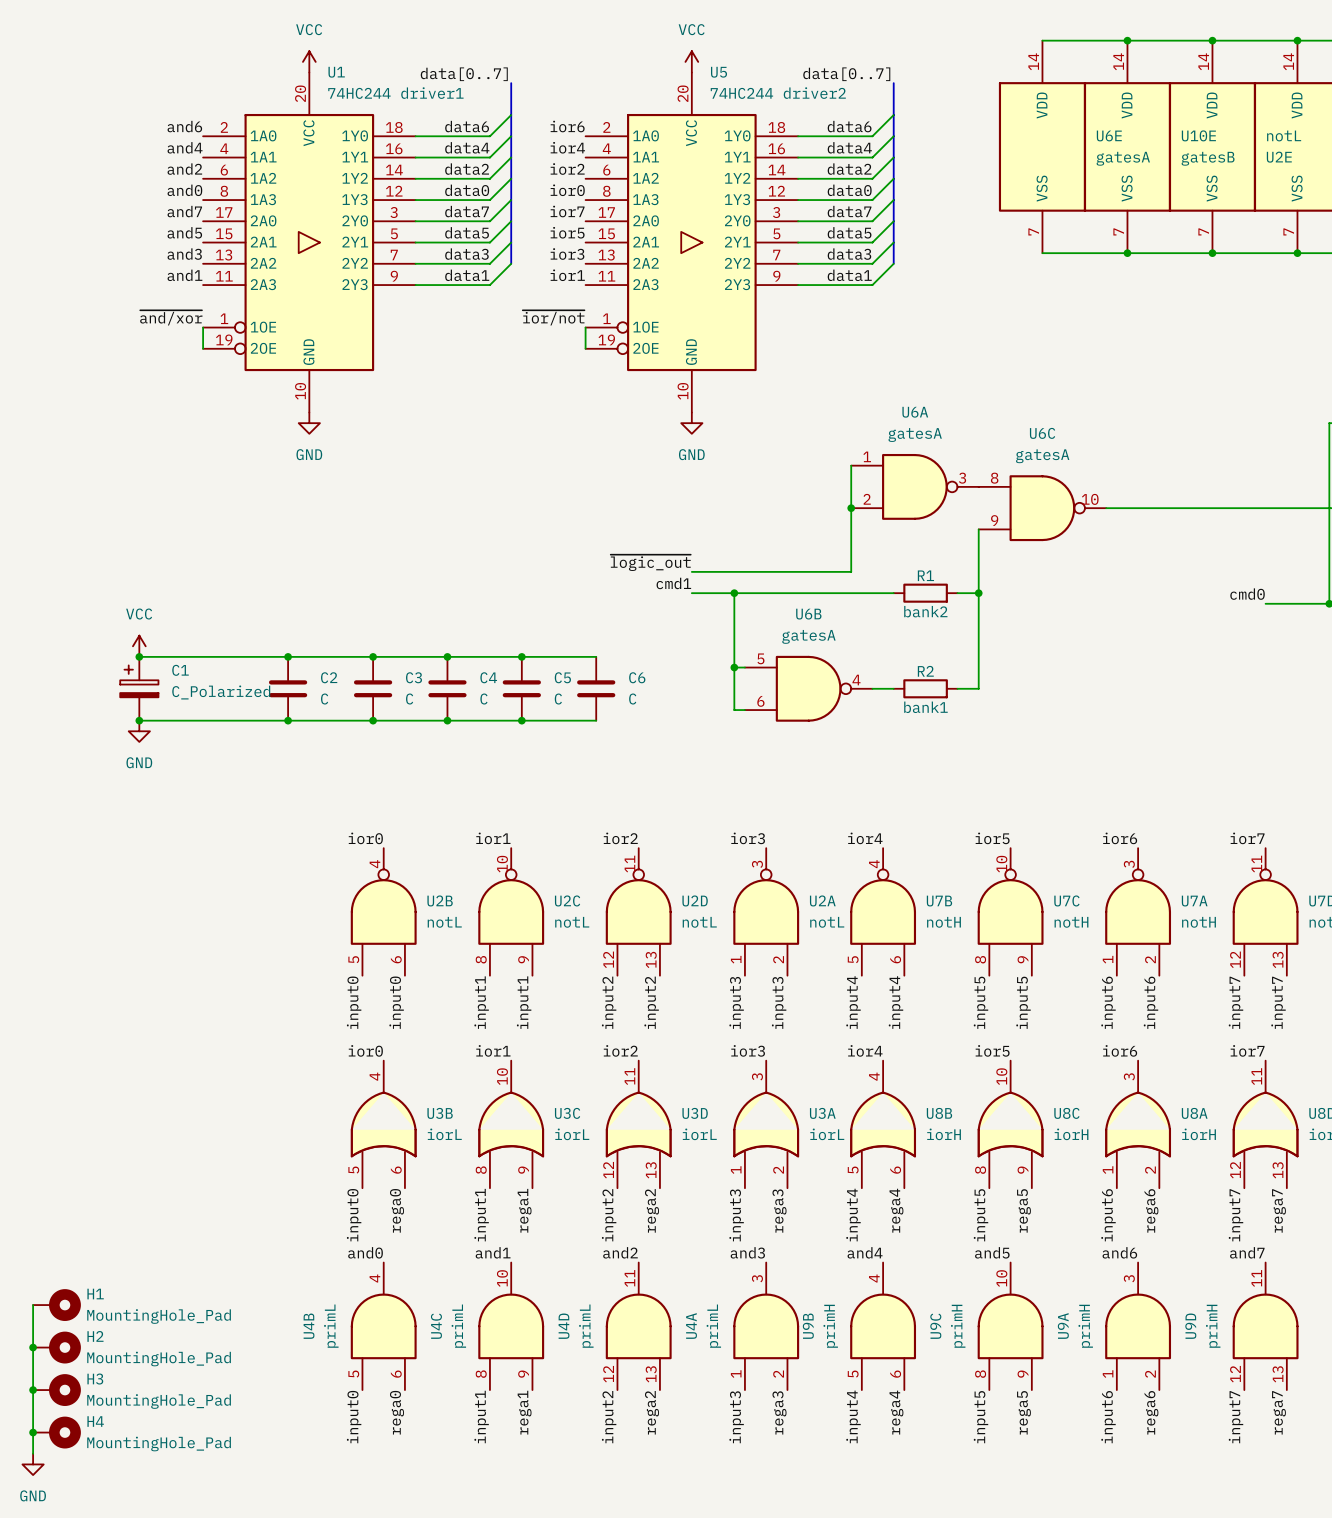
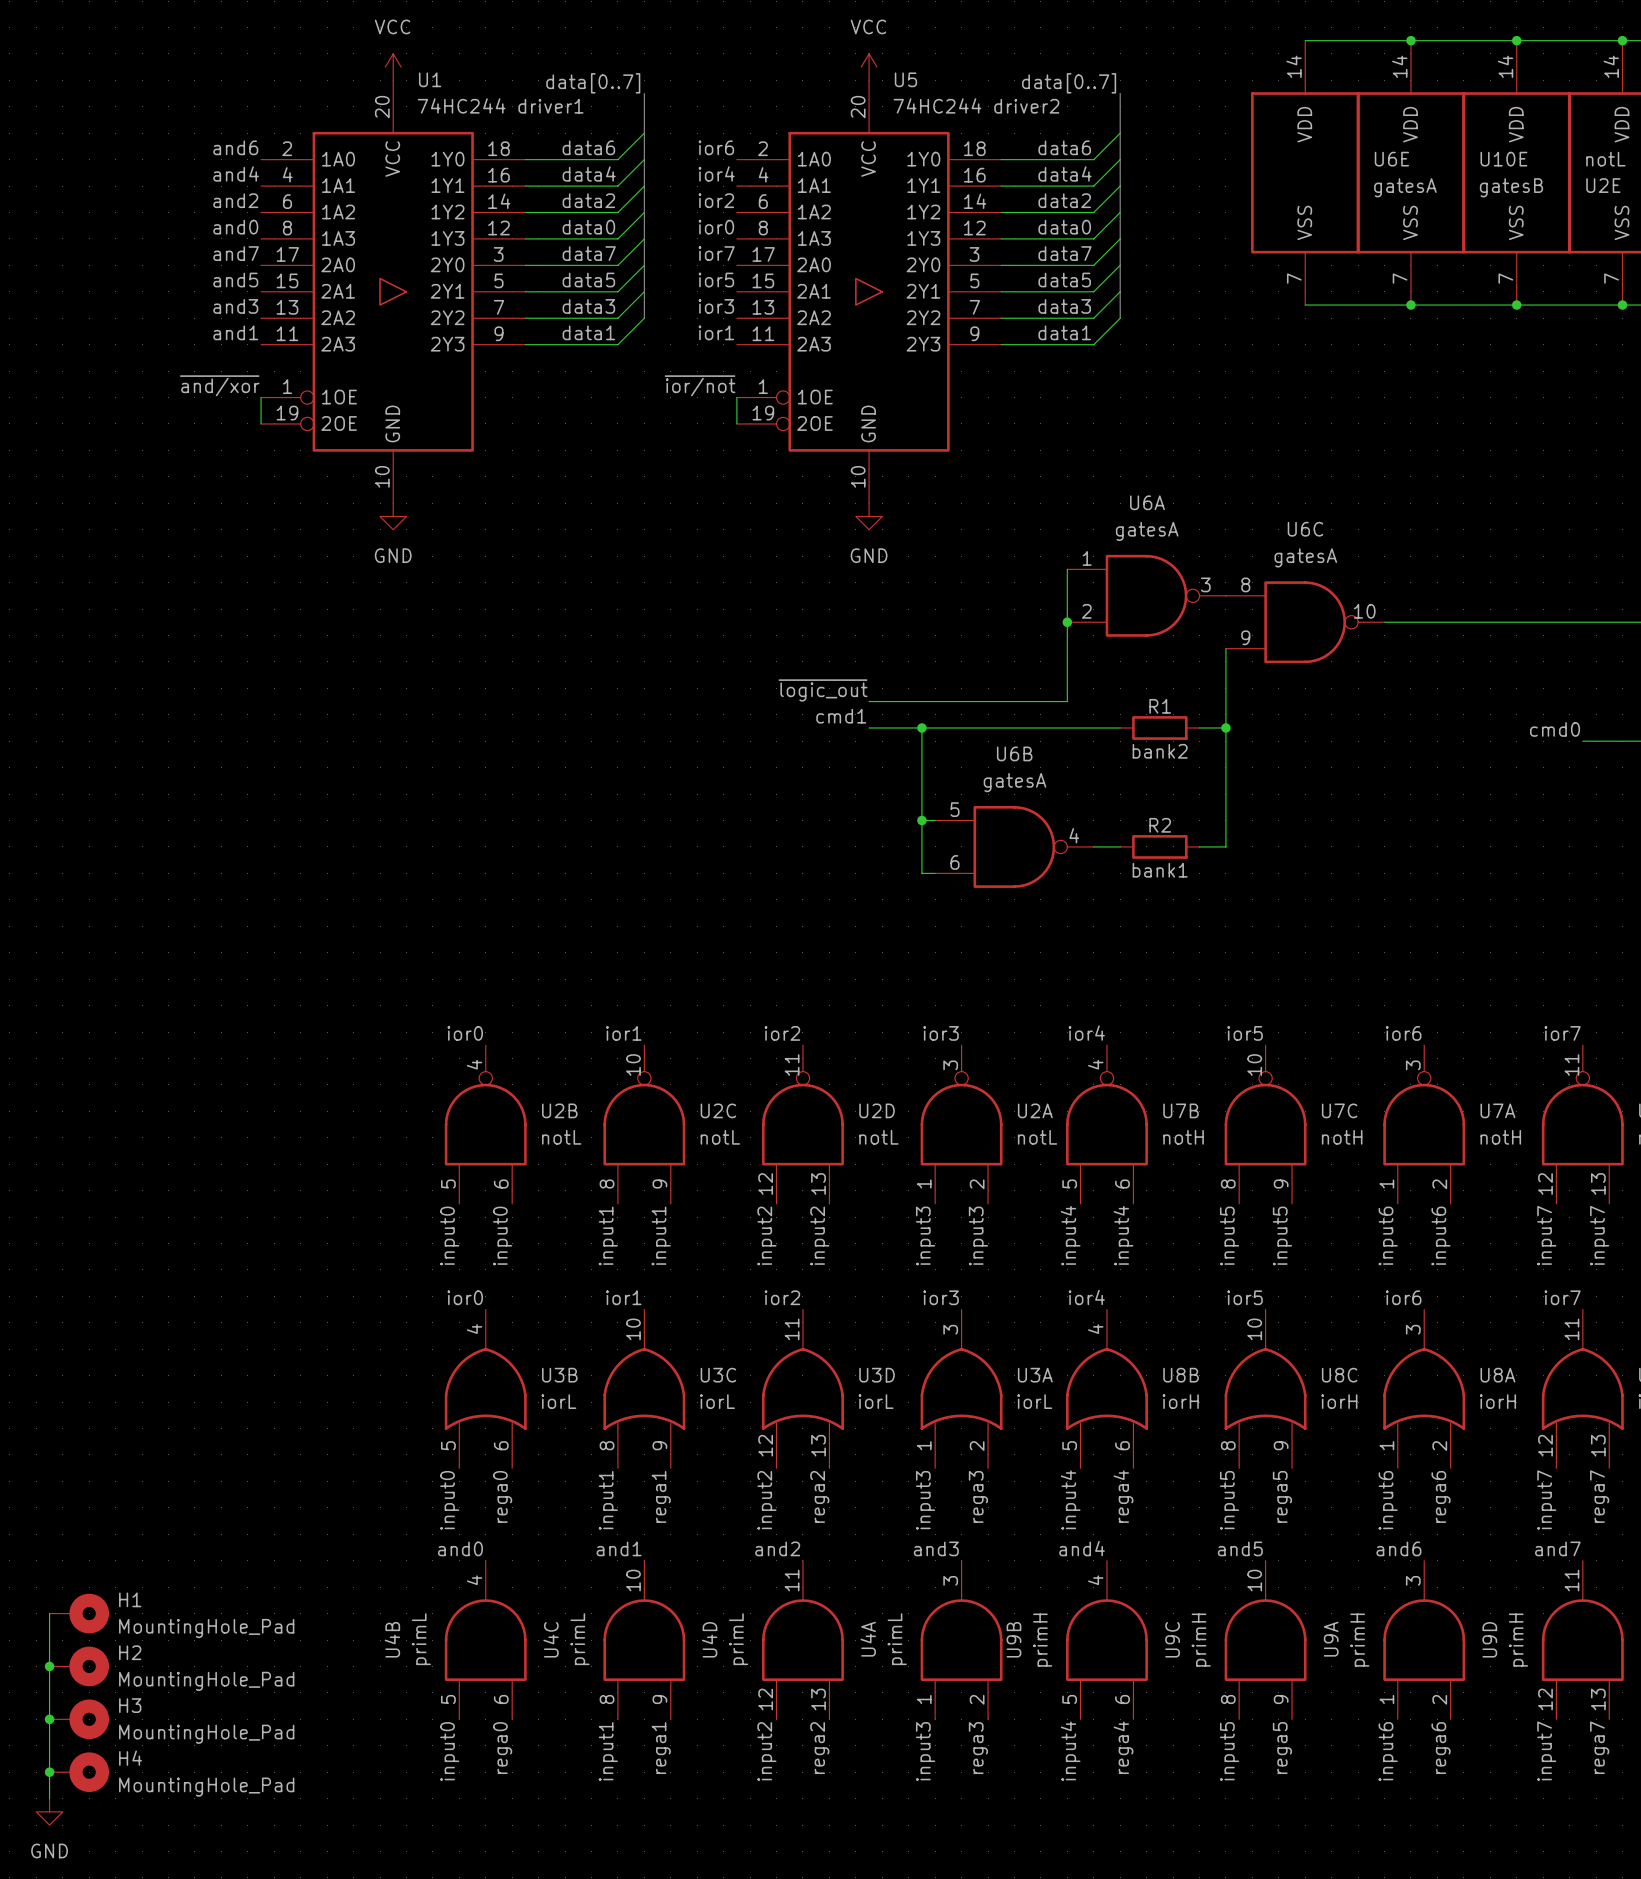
power symbol: VCC (139, 646) -> none
wire: (139, 656) (596, 656) -> none
junction: (139, 656) -> none
junction: (288, 656) -> none
junction: (373, 656) -> none
junction: (447, 656) -> none
junction: (521, 656) -> none
C1: C_Polarized (139, 688) -> none
C2: C (288, 688) -> none
C3: C (373, 688) -> none
C4: C (447, 688) -> none
C5: C (521, 688) -> none
C6: C (596, 688) -> none
wire: (139, 720) (596, 720) -> none
junction: (139, 720) -> none
junction: (288, 720) -> none
junction: (373, 720) -> none
junction: (447, 720) -> none
junction: (521, 720) -> none
power symbol: GND (139, 731) -> none

